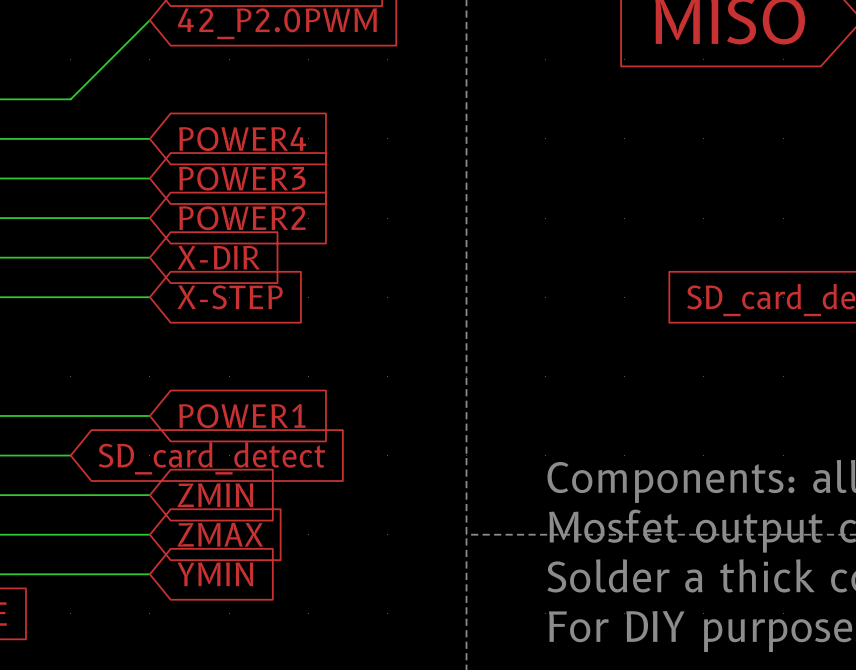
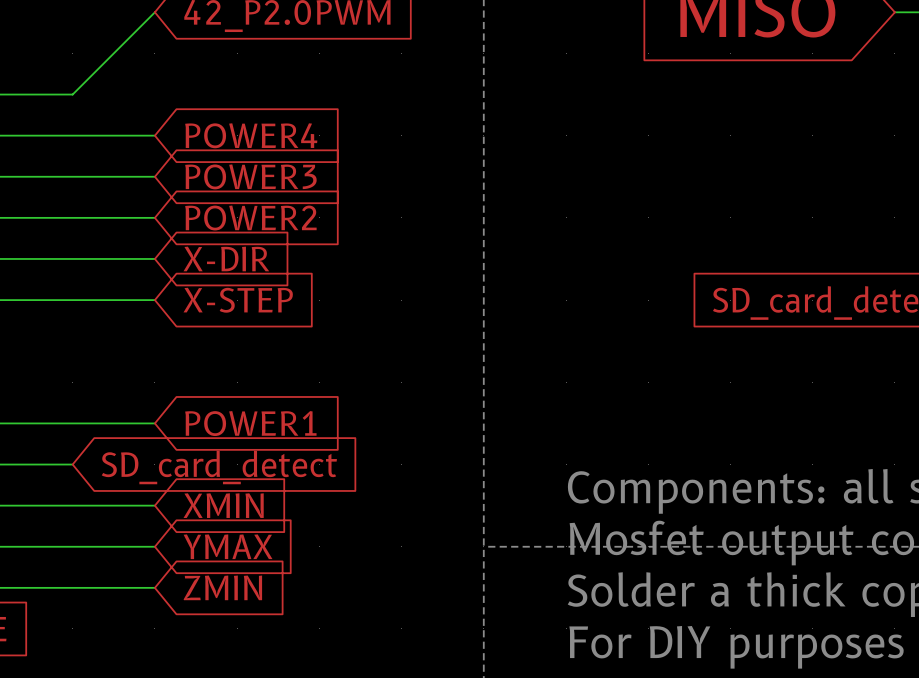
global label: ZMIN (215, 495) -> XMIN (223, 505)
global label: ZMAX (220, 534) -> YMAX (228, 546)
global label: YMIN (215, 574) -> ZMIN (222, 587)

